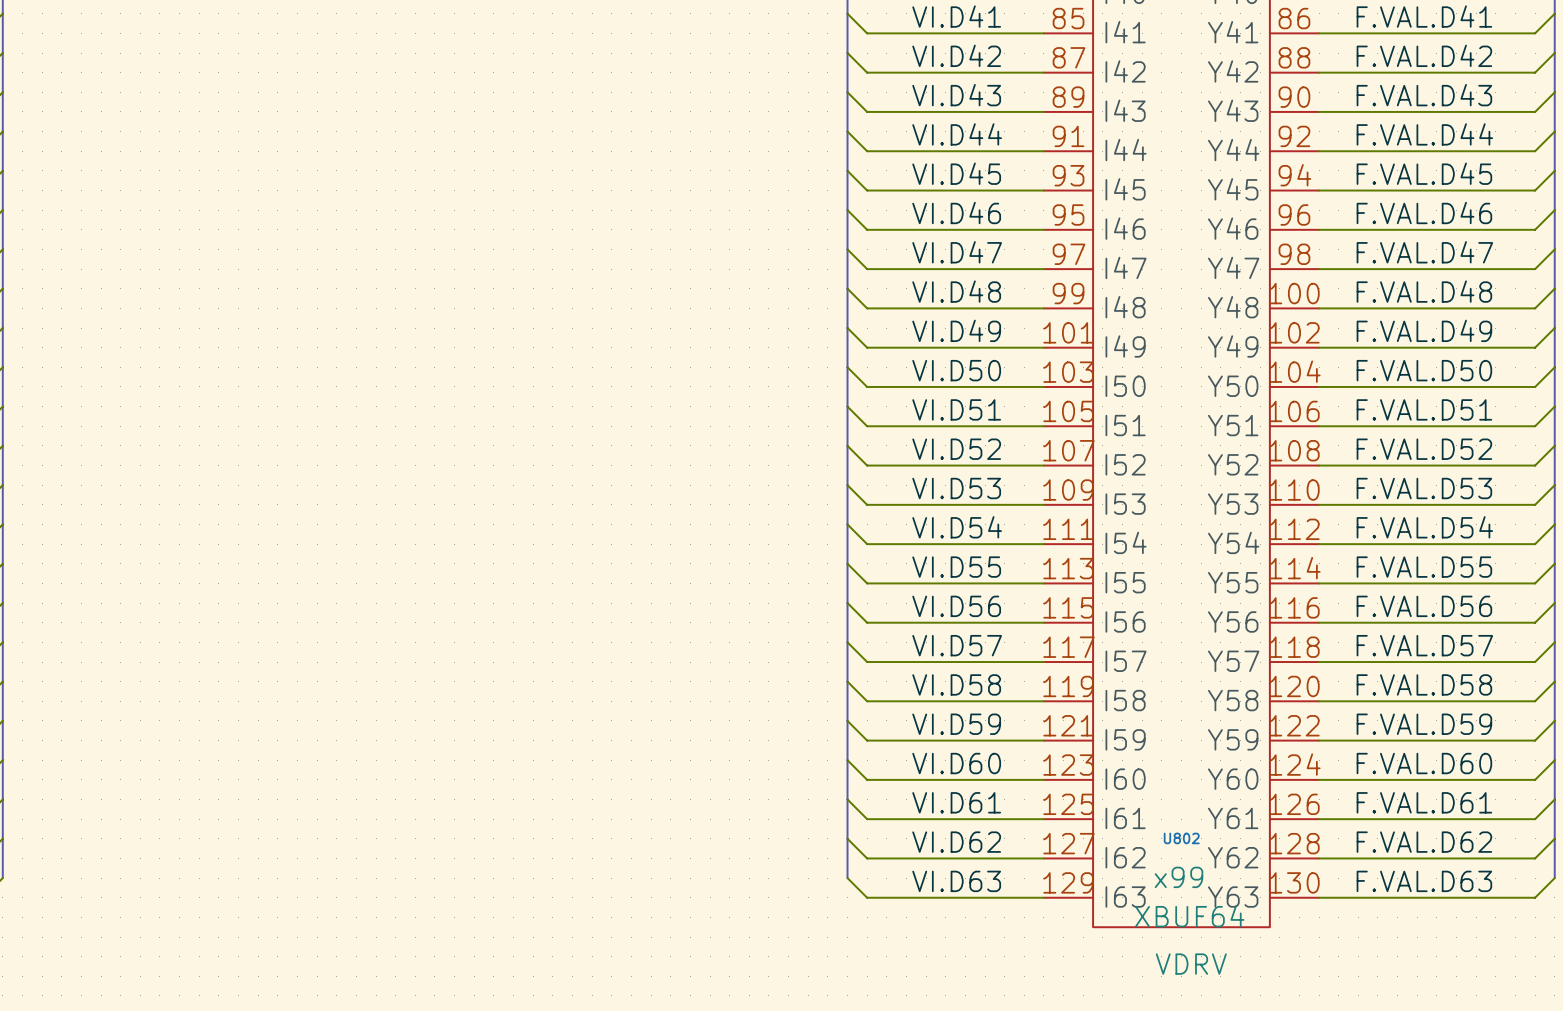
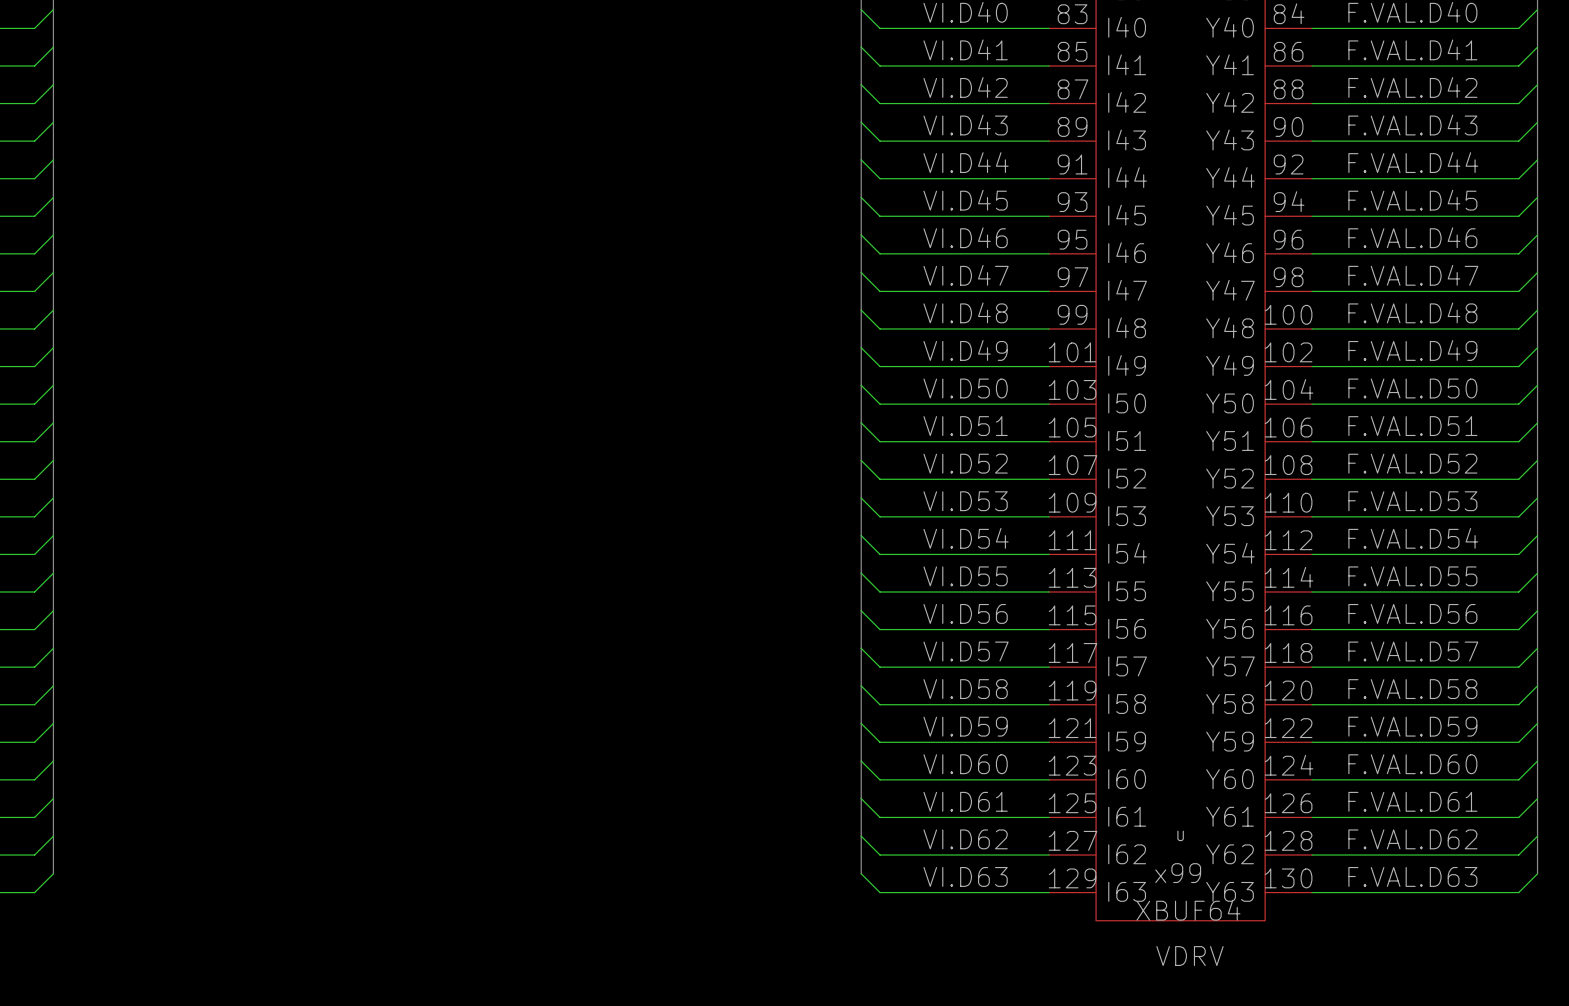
U802 name: U802 (1181, 838) -> U (1180, 835)

